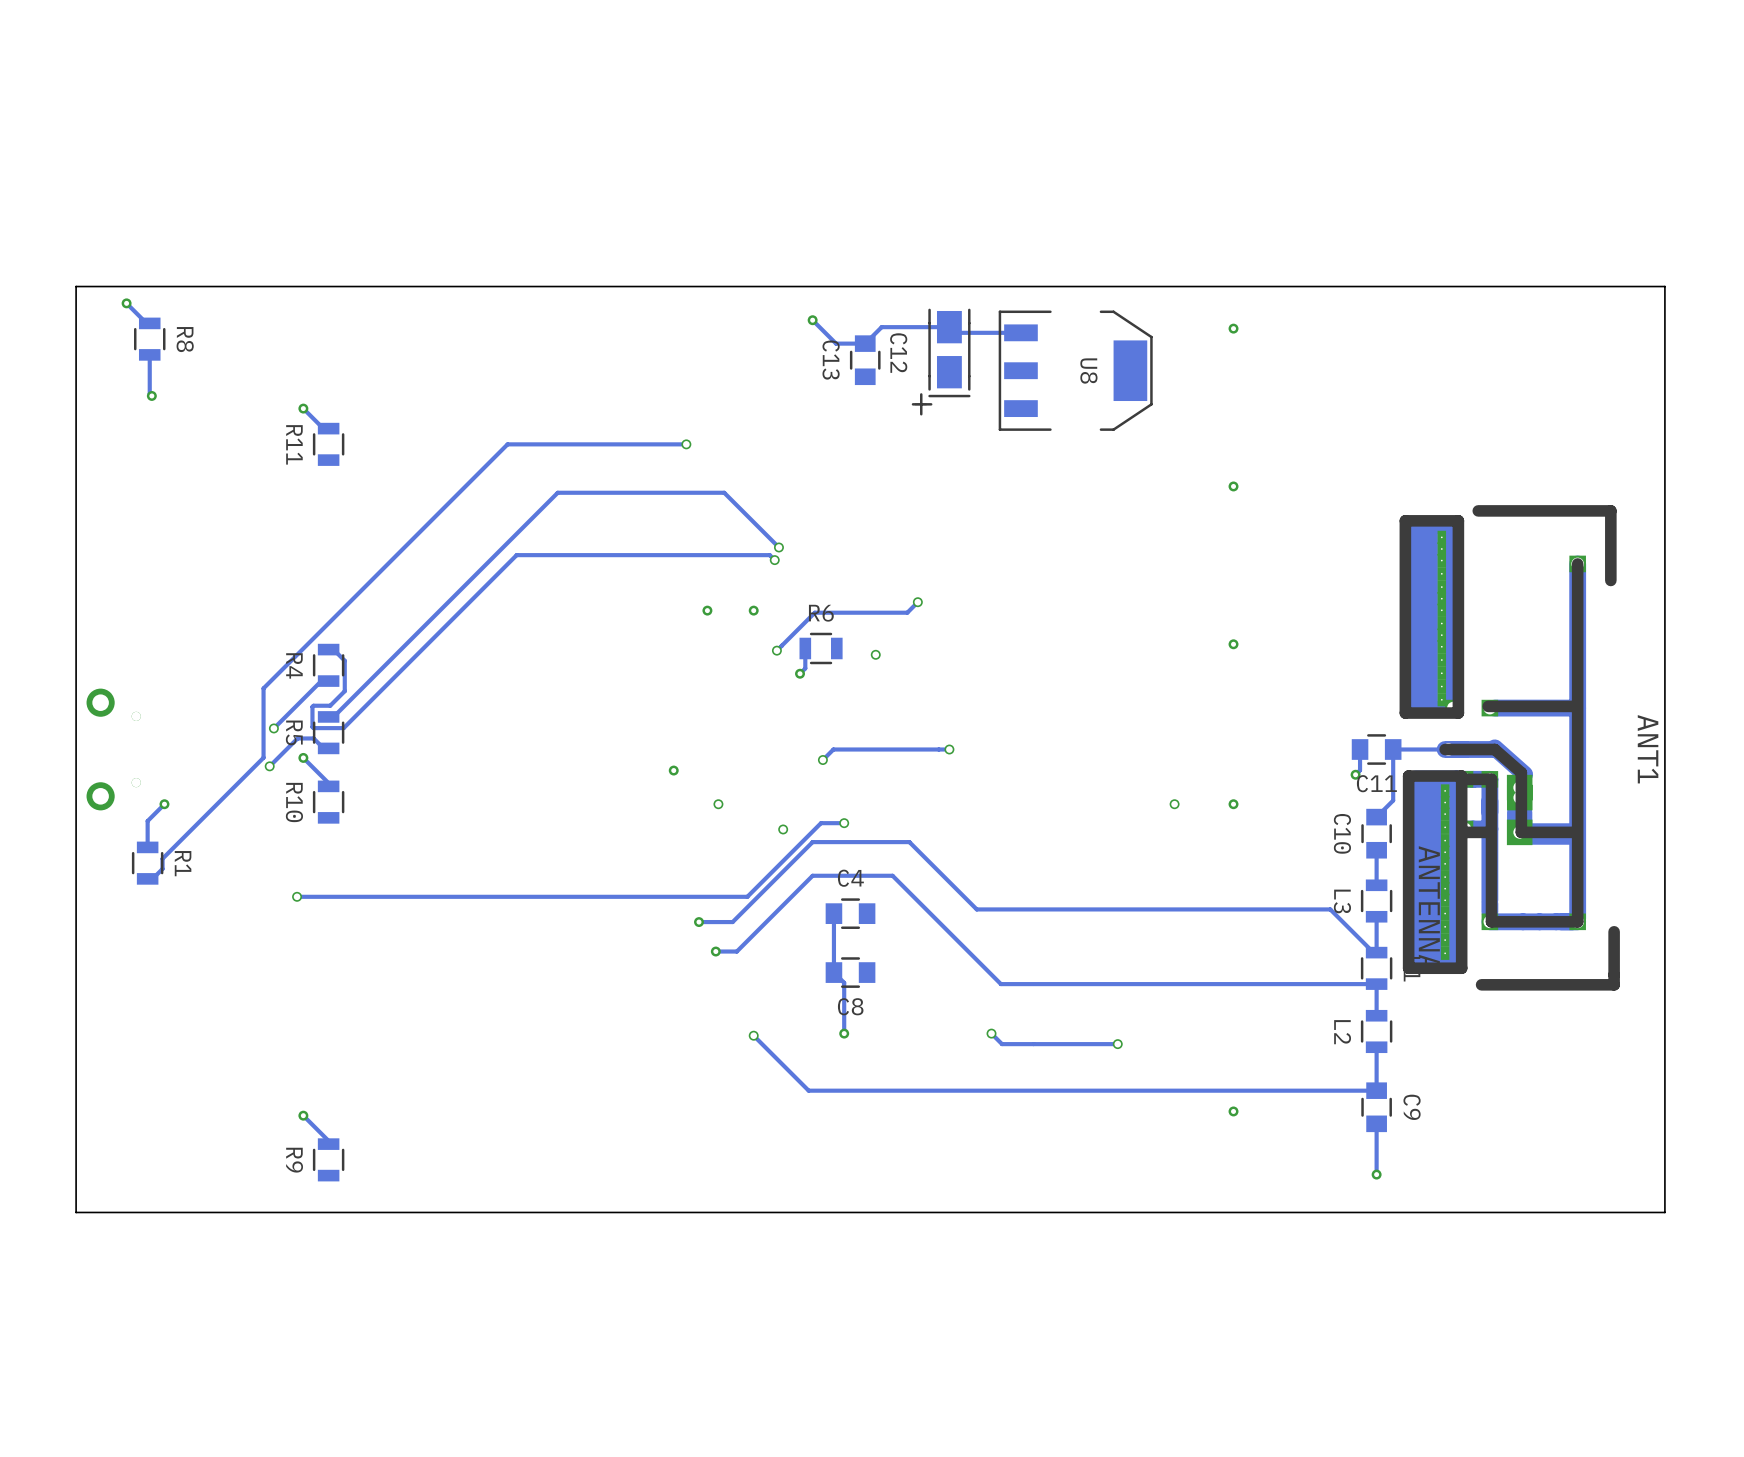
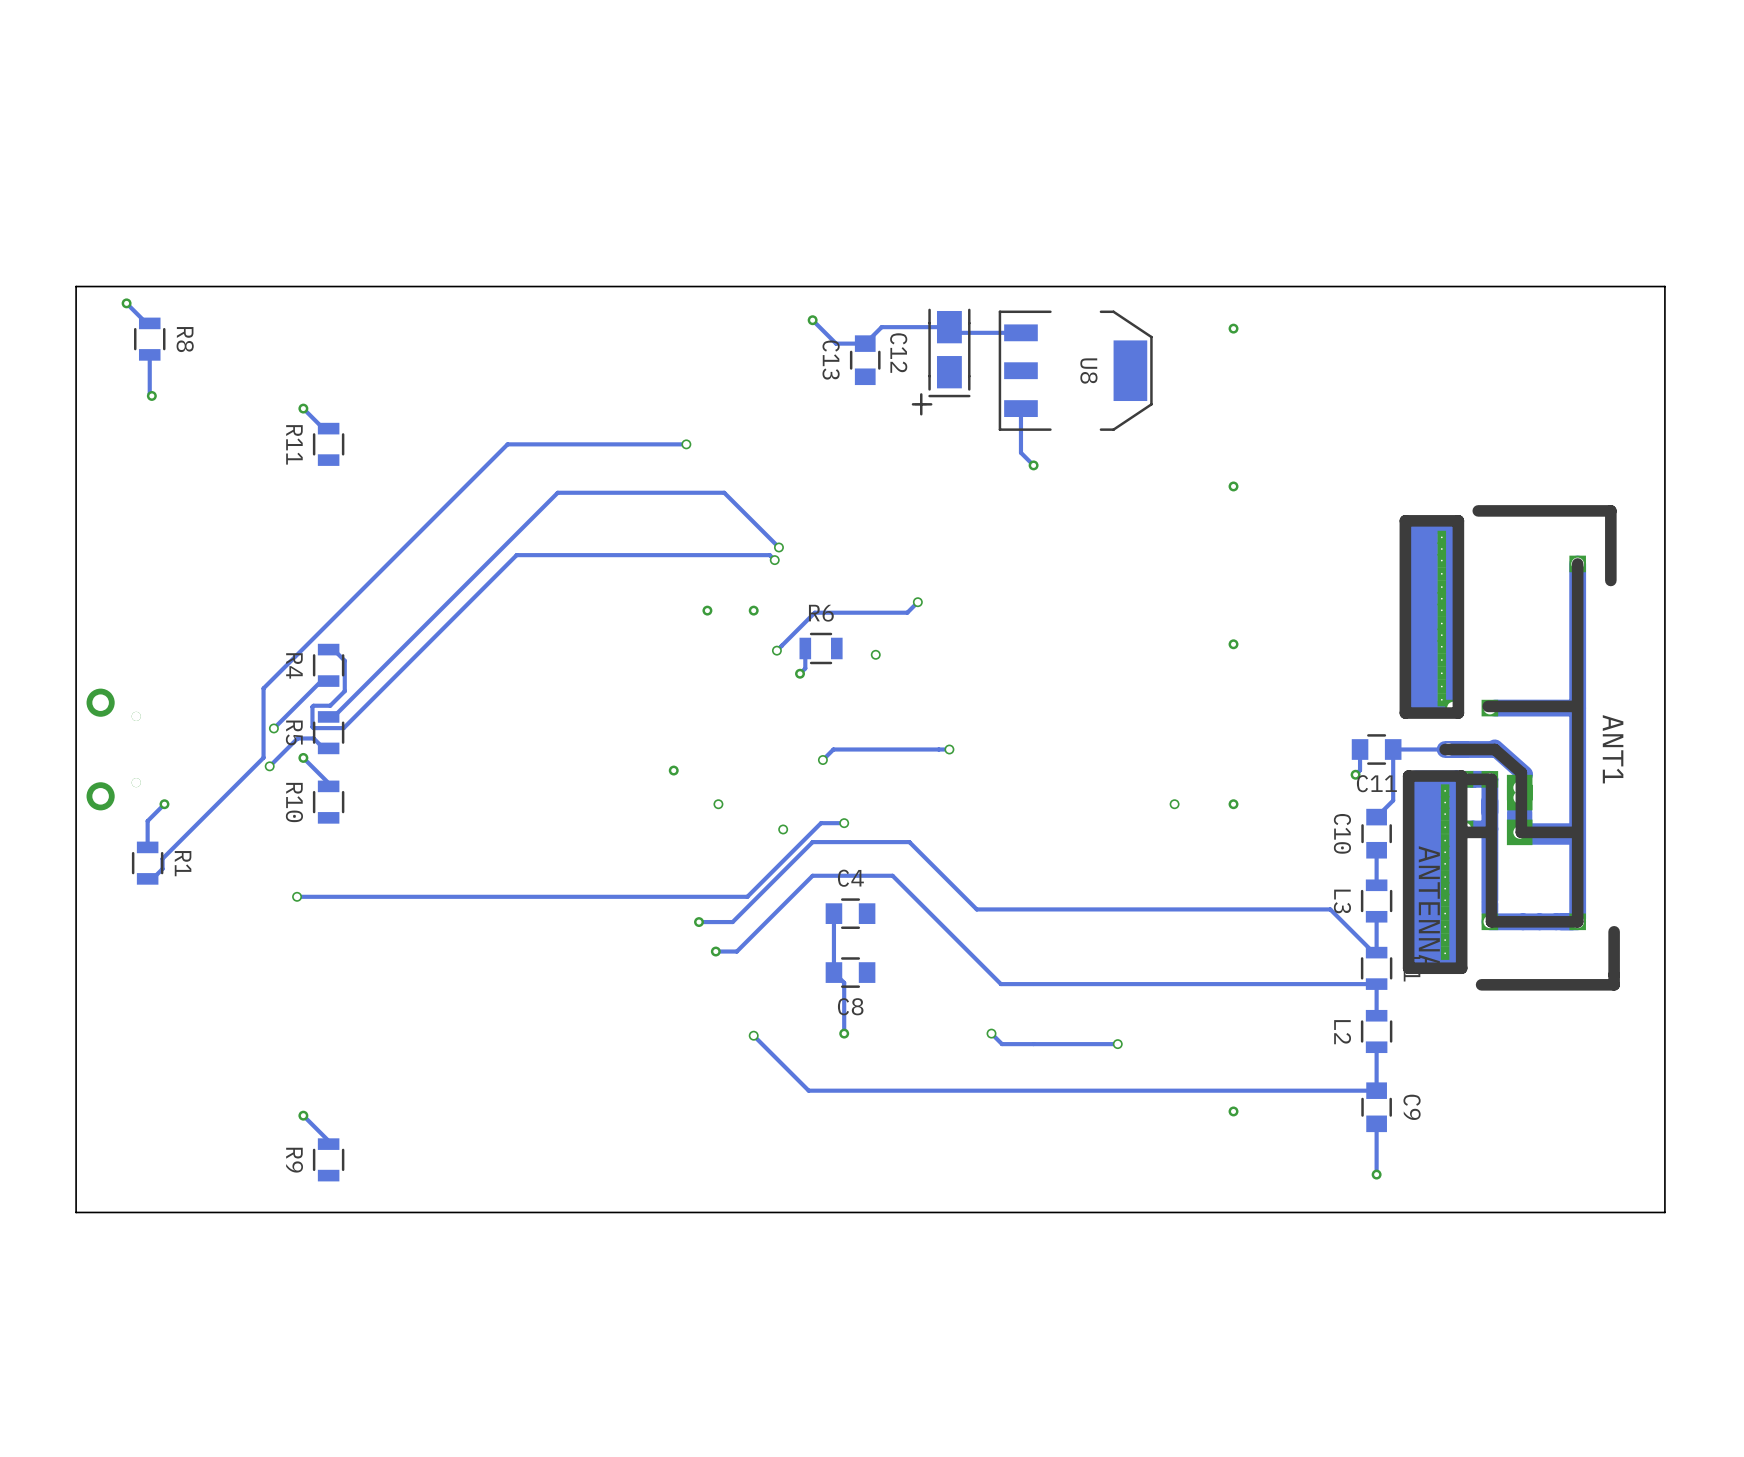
track: none -> (1020, 408) (1020, 452) (1033, 465)
via: none -> (1033, 465)
ANT1 name position: ANT1 (1648, 749) -> ANT1 (1613, 749)

